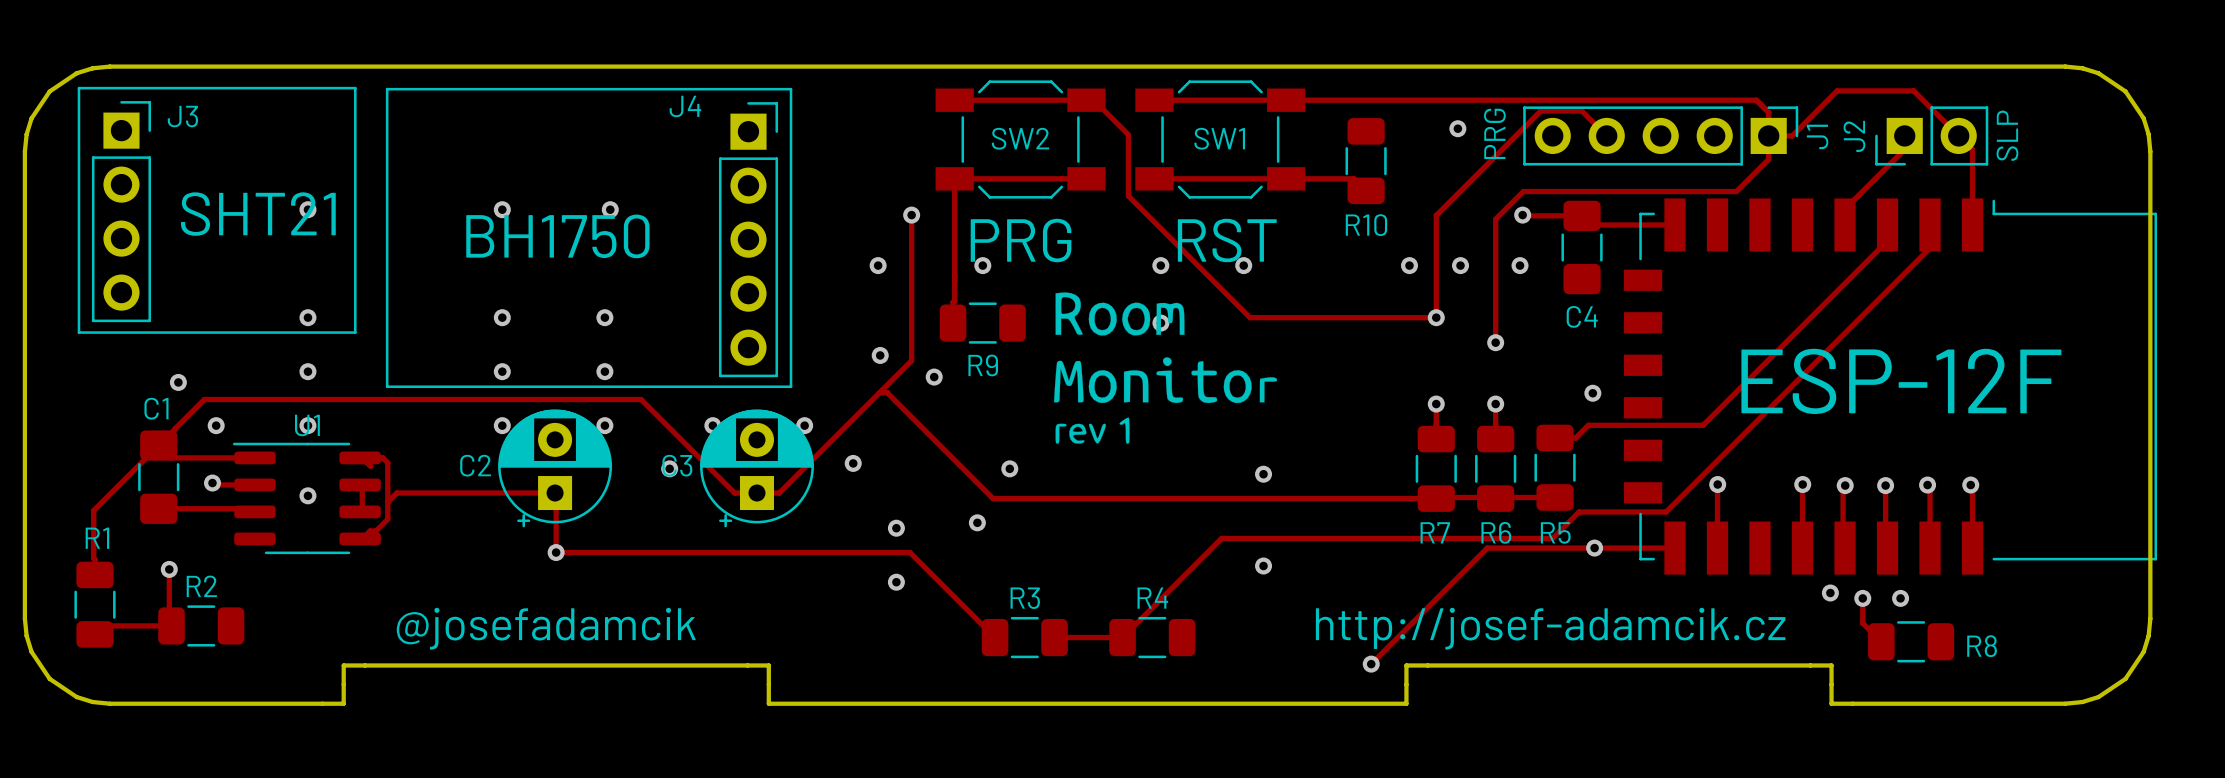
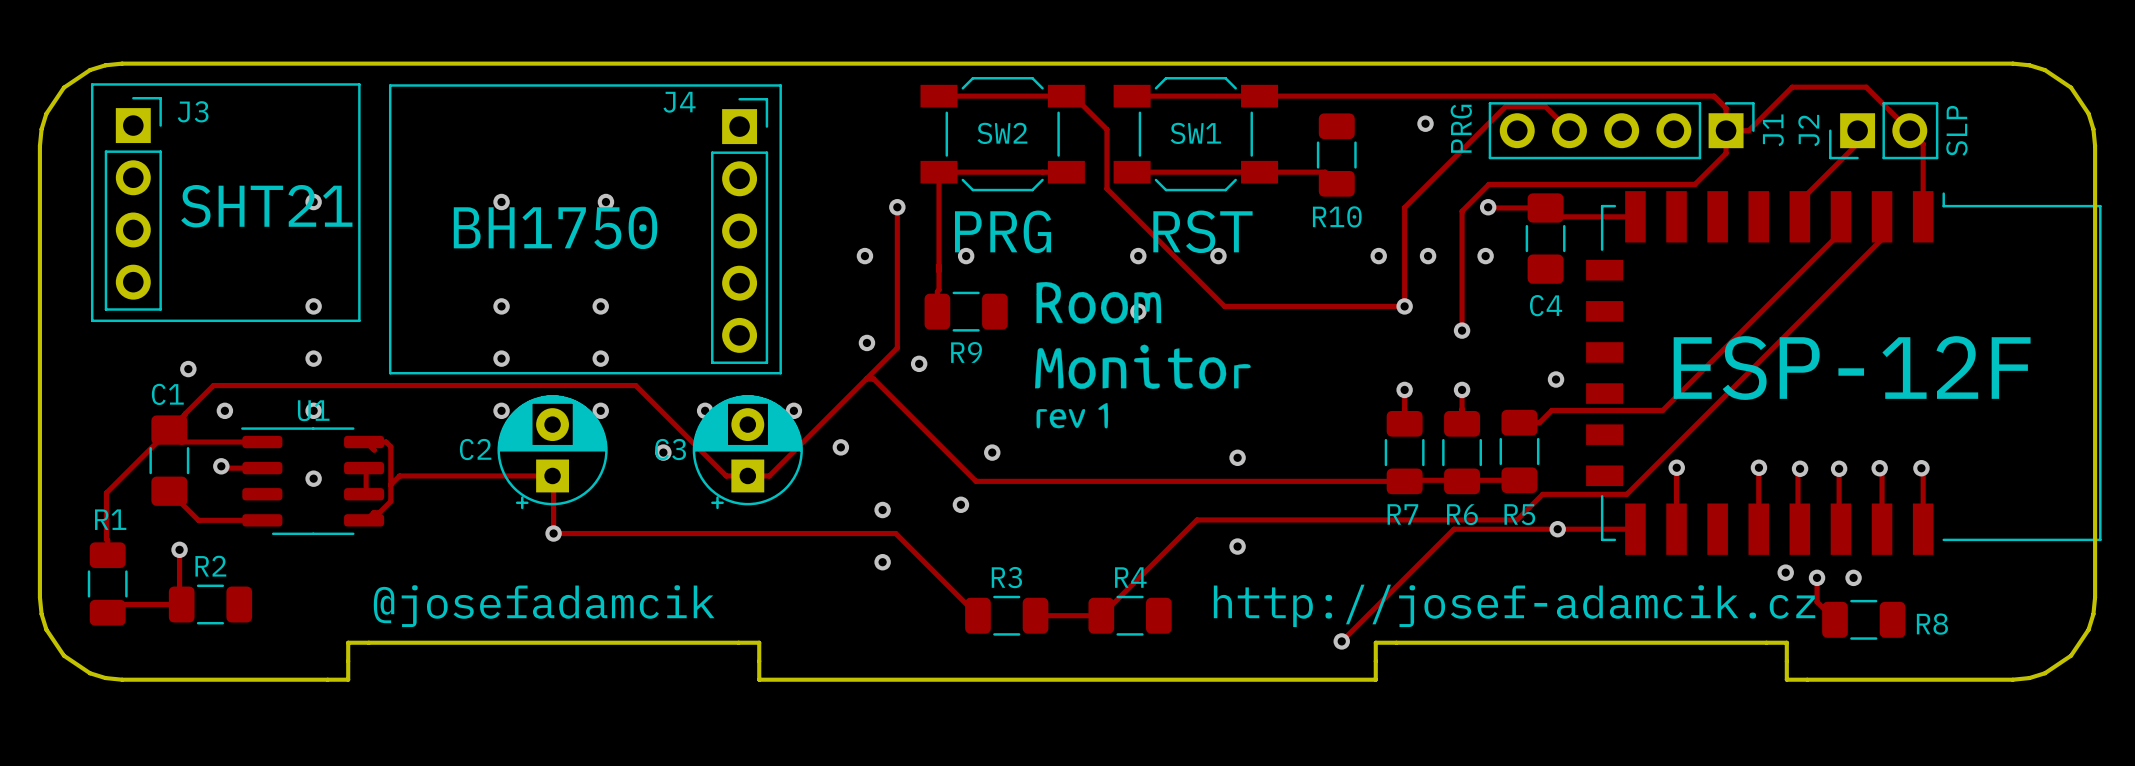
track: (158, 508) (249, 508) -> (169, 491) (198, 520) (262, 520)

